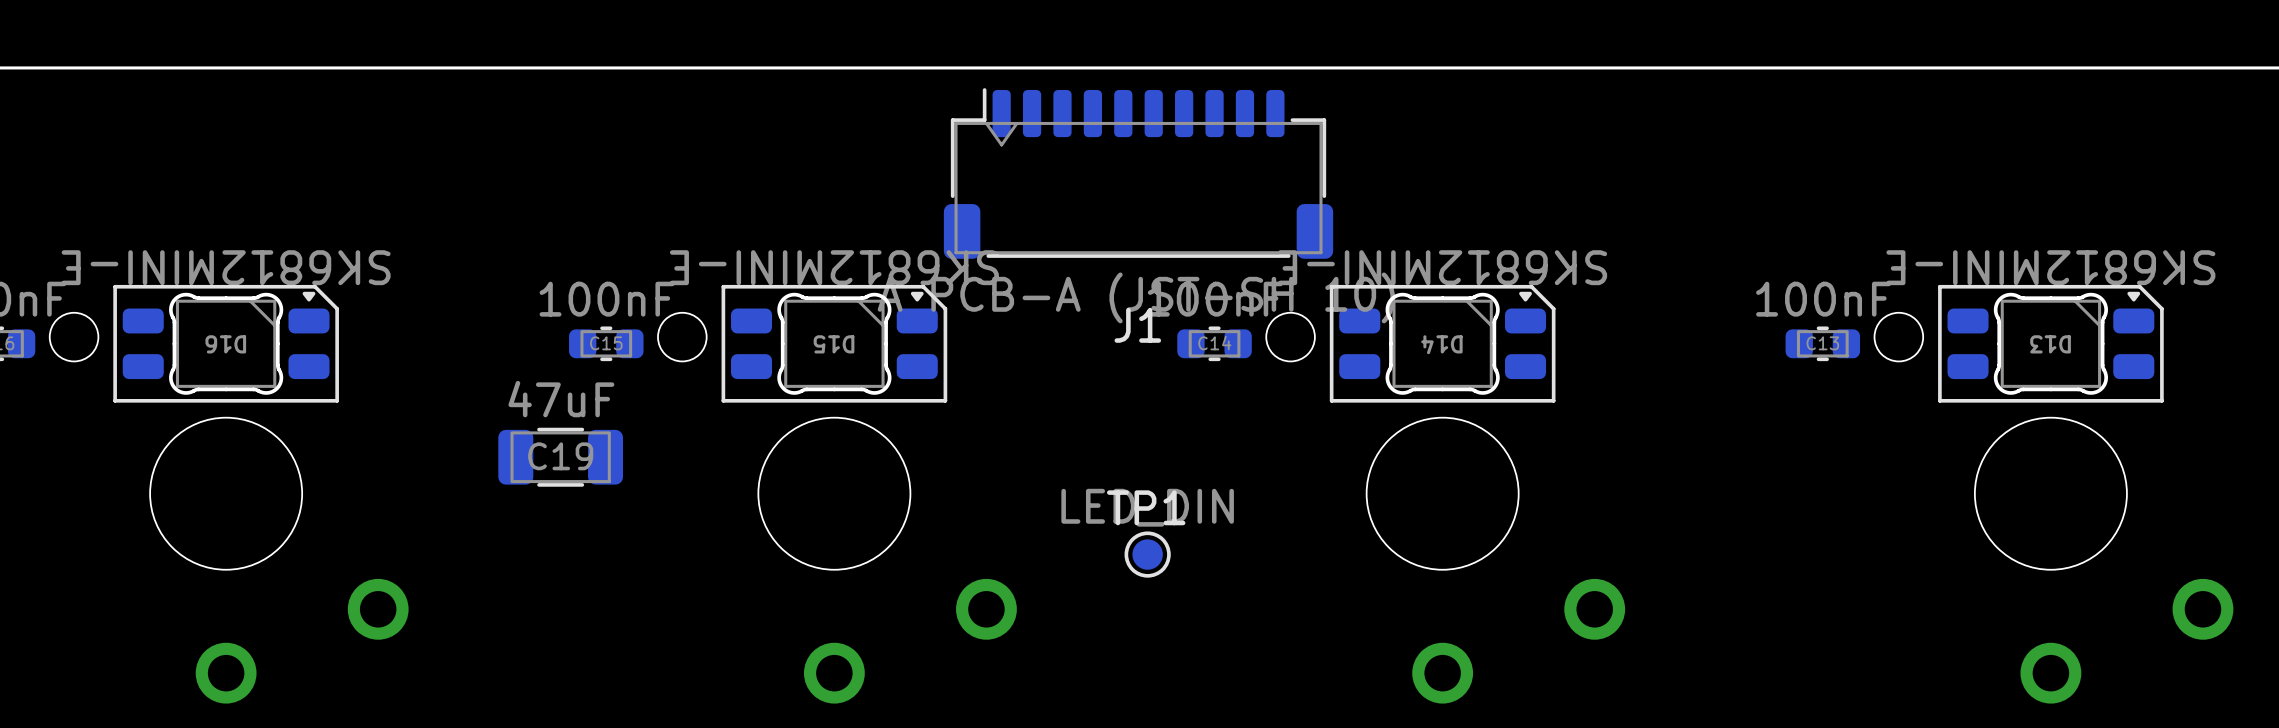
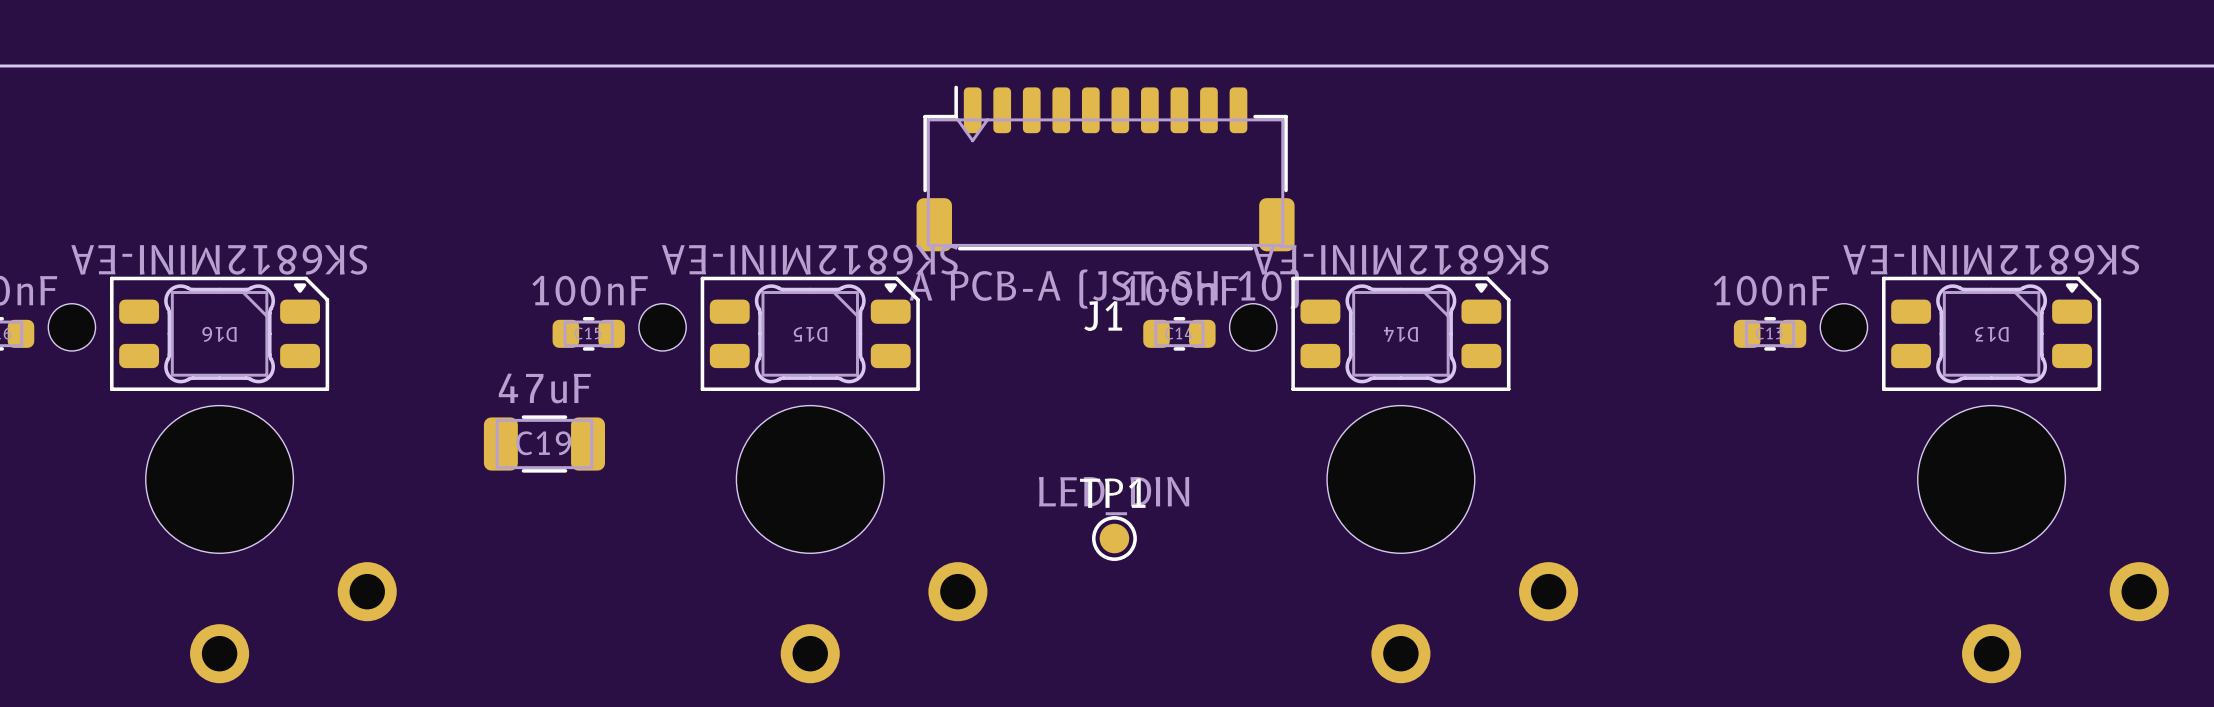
D16 value: SK6812MINI-E (226, 267) -> SK6812MINI-EA (219, 259)
D15 value: SK6812MINI-E (834, 267) -> SK6812MINI-EA (810, 259)
D14 value: SK6812MINI-E (1442, 267) -> SK6812MINI-EA (1400, 259)
D13 value: SK6812MINI-E (2050, 267) -> SK6812MINI-EA (1991, 259)

